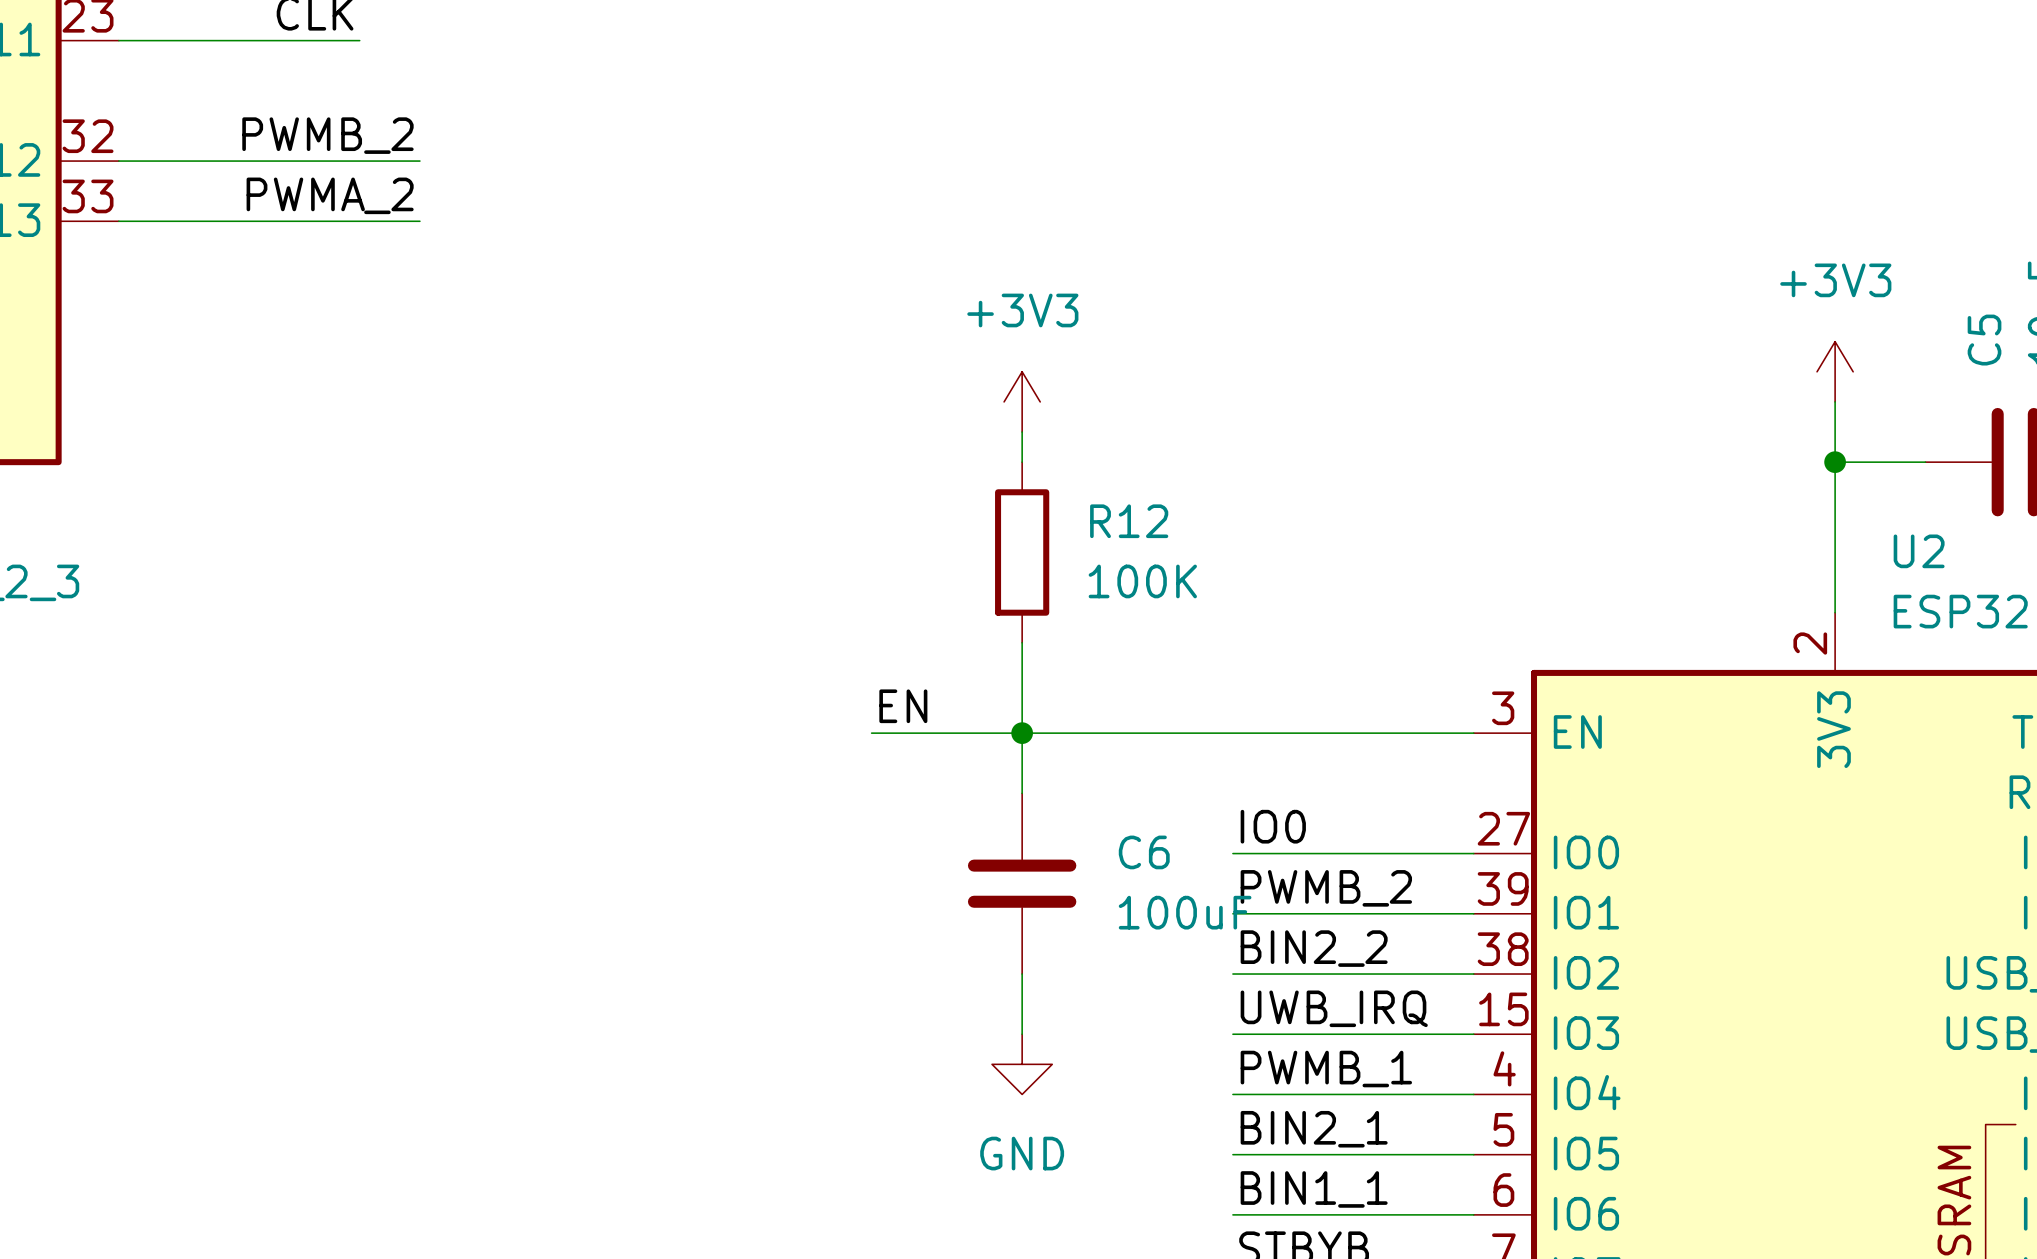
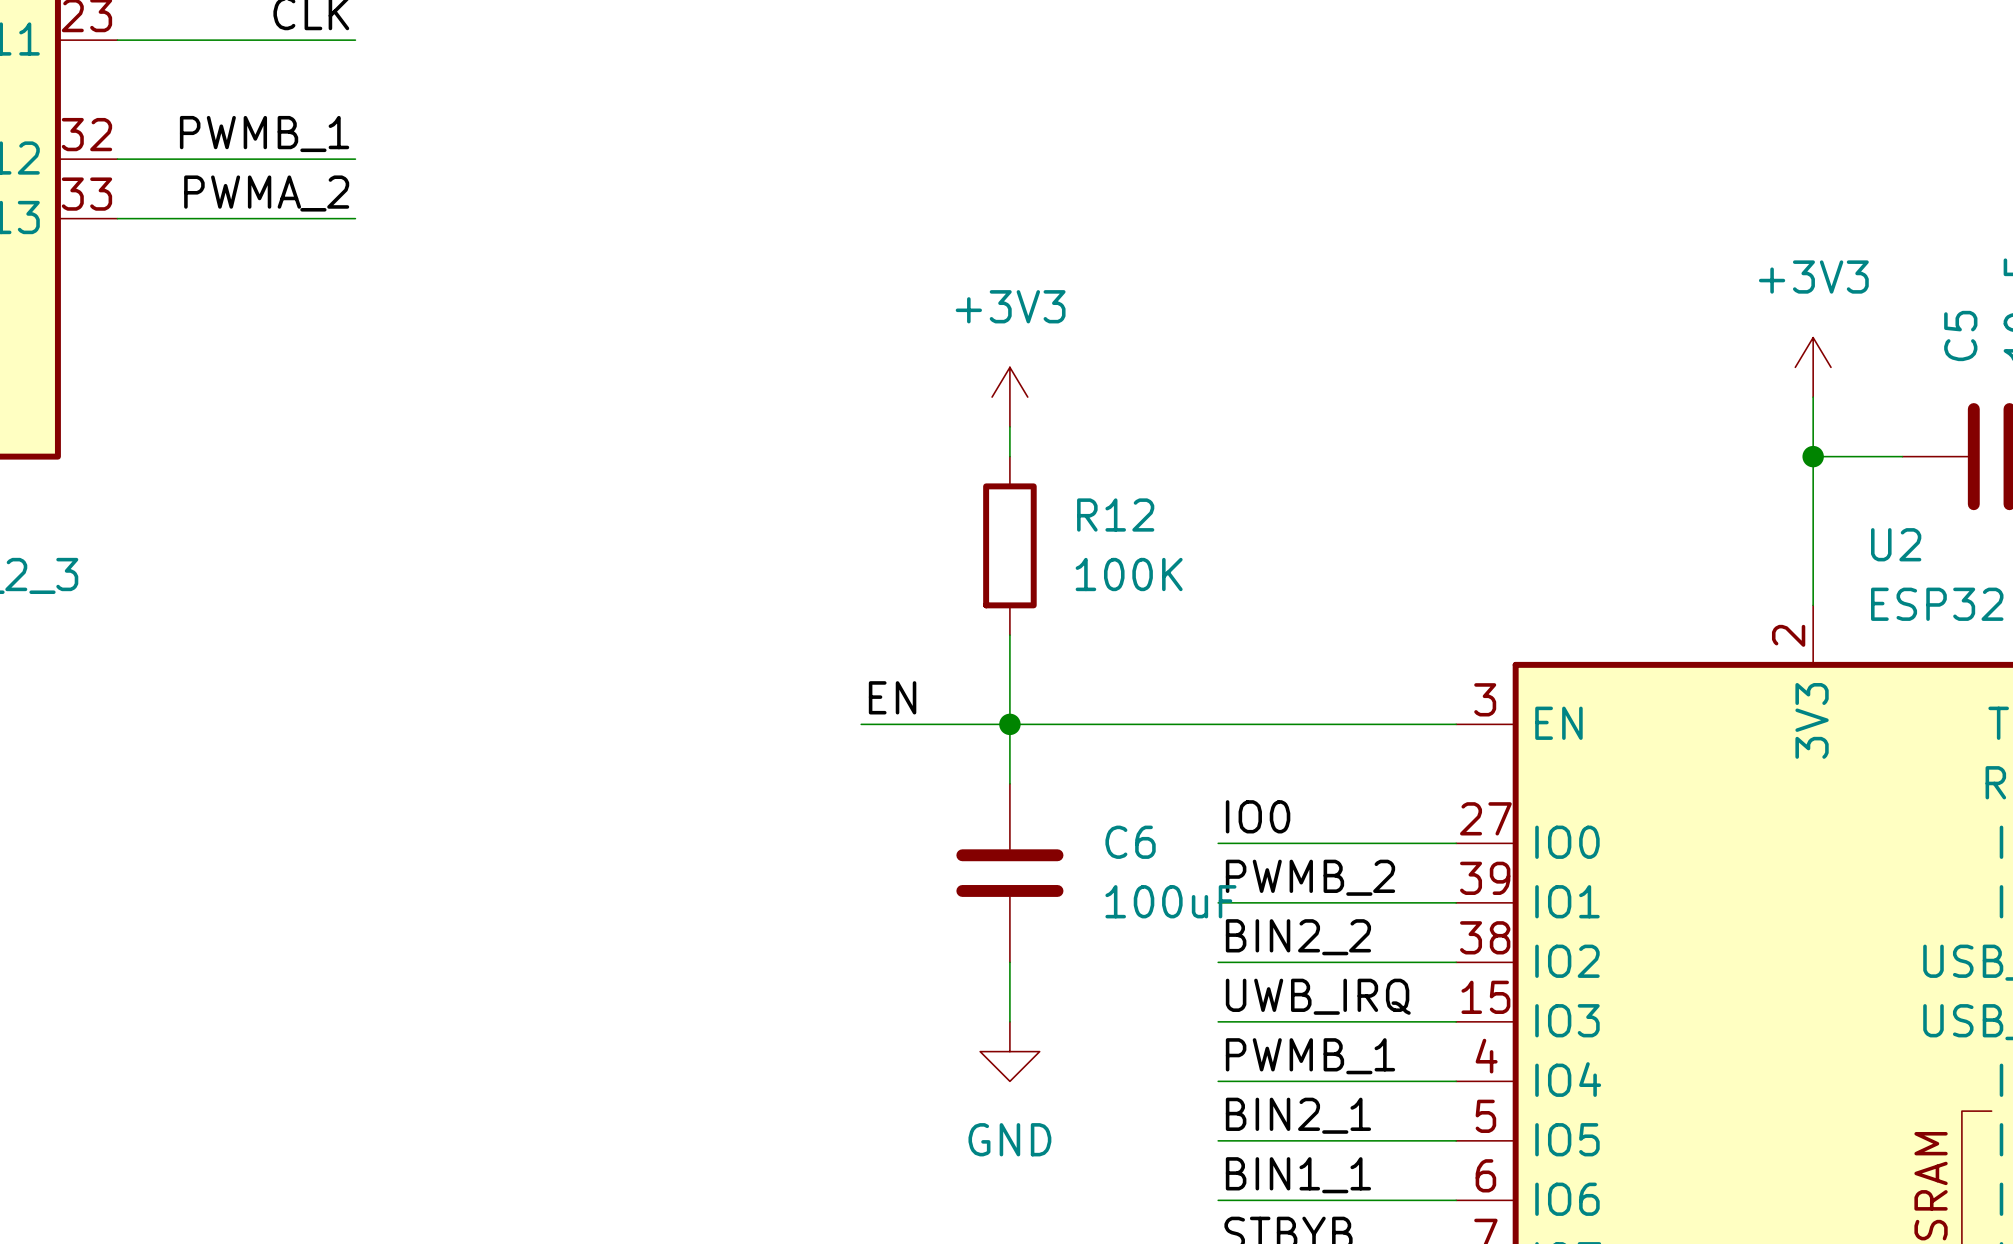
label: PWMB_2 (327, 135) -> PWMB_1 (264, 134)
wire: (359, 161) (419, 161) -> none
label position: PWMA_2 (330, 195) -> PWMA_2 (266, 193)
wire: (359, 221) (419, 221) -> none

